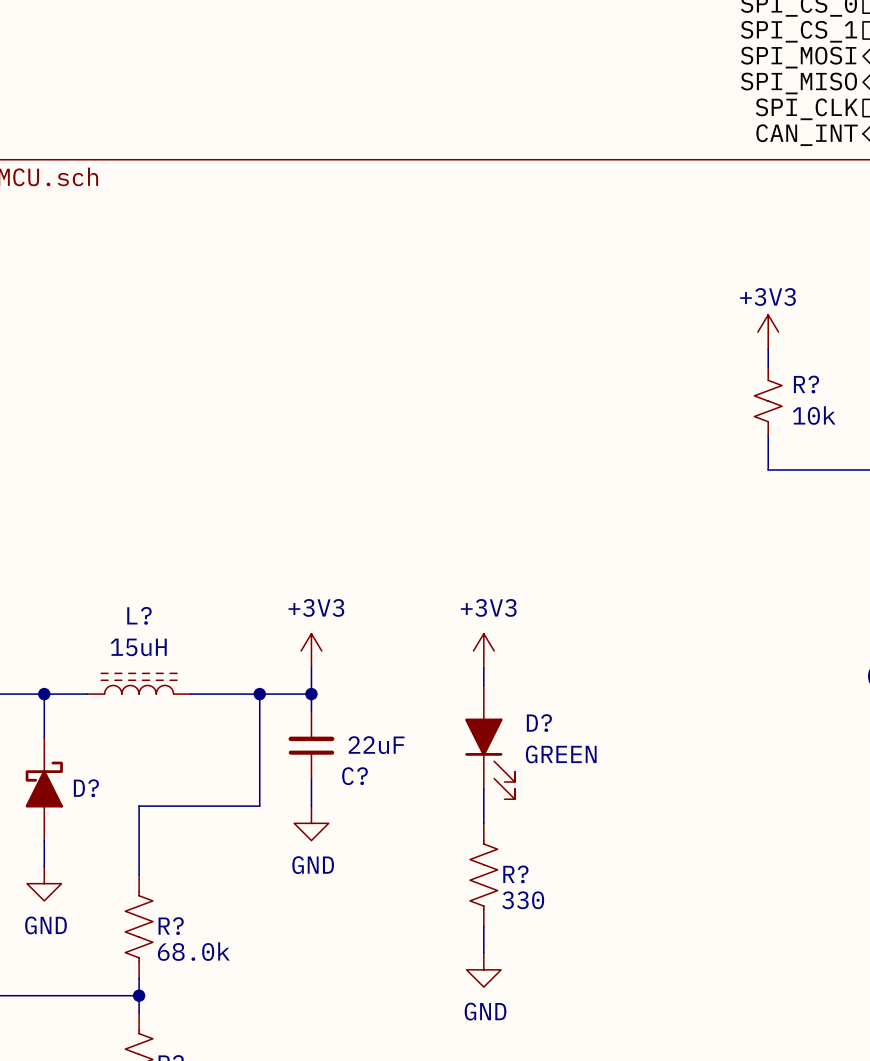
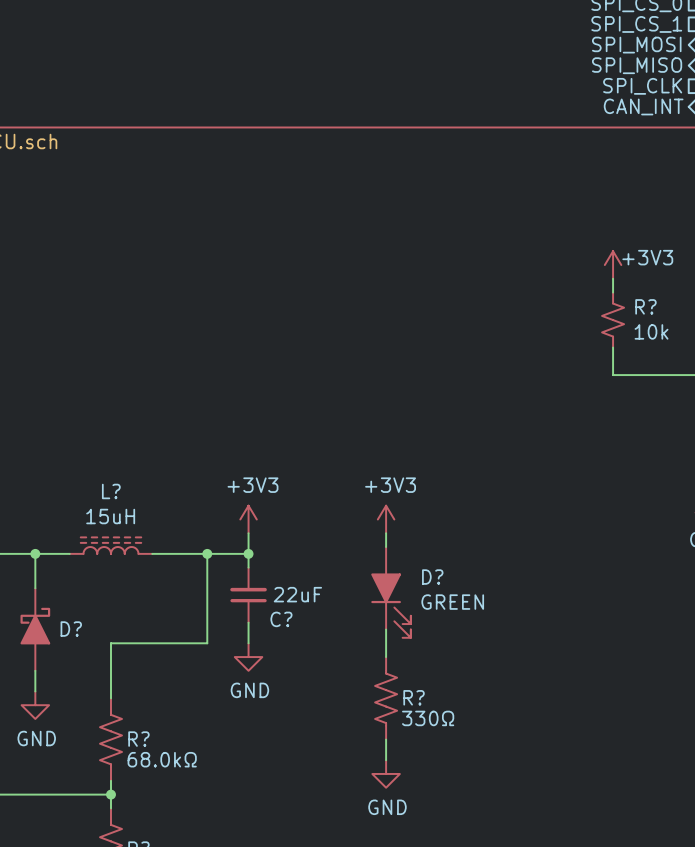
power symbol text position: +3V3 (767, 296) -> +3V3 (647, 257)
R? value: 330 (523, 900) -> 330Ω (428, 718)
R? value: 68.0k (193, 951) -> 68.0kΩ (162, 759)

